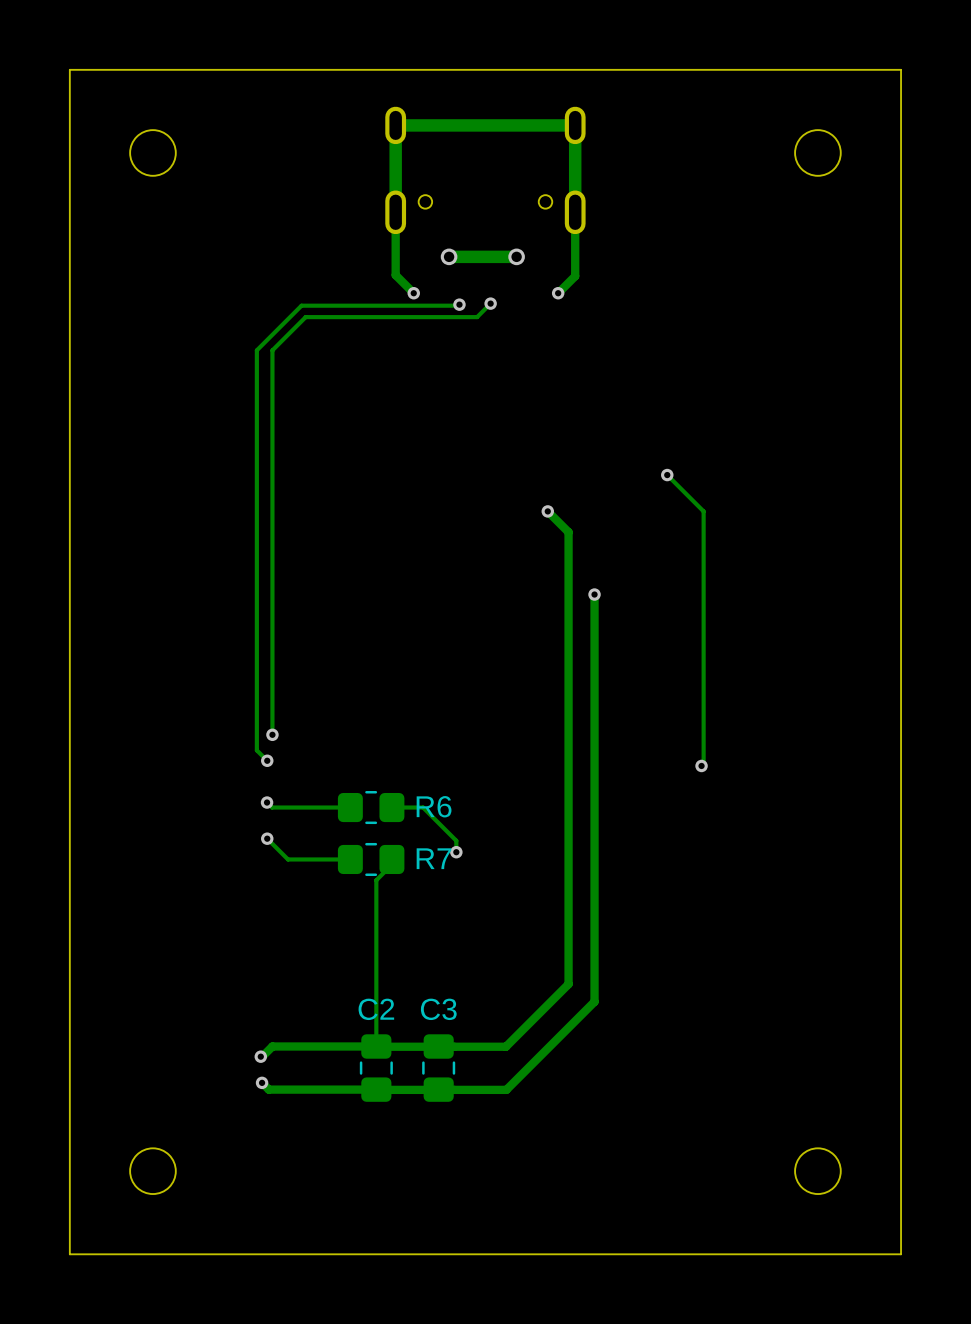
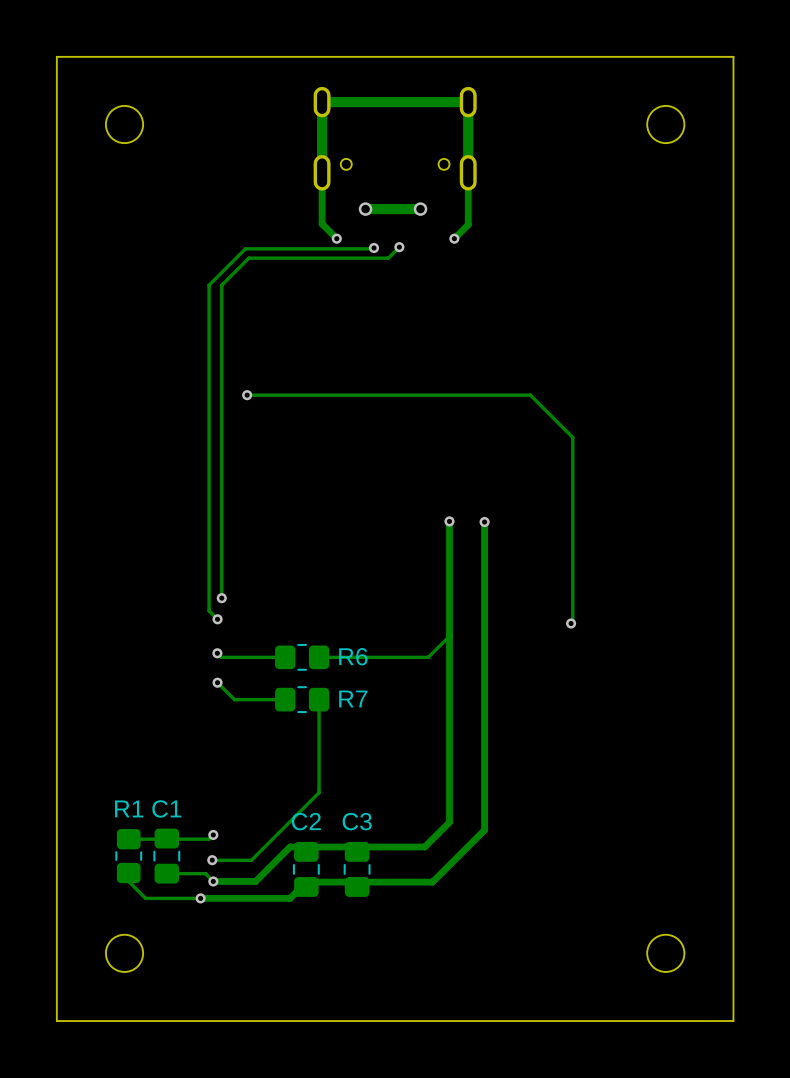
track: (667, 475) (703, 511) (703, 537) -> (247, 395) (530, 395) (572, 437)
via: (667, 475) -> none
via: none -> (247, 395)
track: (547, 511) (568, 532) (568, 984) (505, 1046) (376, 1046) -> none
via: (547, 511) -> none
track: (594, 594) (594, 1001) (506, 1089) (376, 1089) -> none
via: (594, 594) -> none
track: none -> (449, 521) (449, 822) (424, 847) (290, 847) (255, 881) (213, 881) (205, 873) (166, 873)
via: none -> (449, 521)
track: none -> (484, 522) (484, 830) (432, 882) (306, 882) (290, 898) (145, 898) (128, 881) (128, 873)
via: none -> (484, 522)
track: (423, 807) (456, 840) (456, 852) -> (344, 657) (428, 657) (449, 636)
via: (456, 852) -> none
track: (391, 864) (376, 880) (376, 1046) (272, 1046) (262, 1056) -> (319, 708) (319, 792) (251, 860) (213, 860)
track: none -> (213, 834) (209, 839) (128, 839)
via: none -> (213, 834)
R1: none -> (128, 856)
C1: none -> (166, 856)
track: (262, 1082) (268, 1089) (376, 1089) -> none
via: none -> (200, 898)

